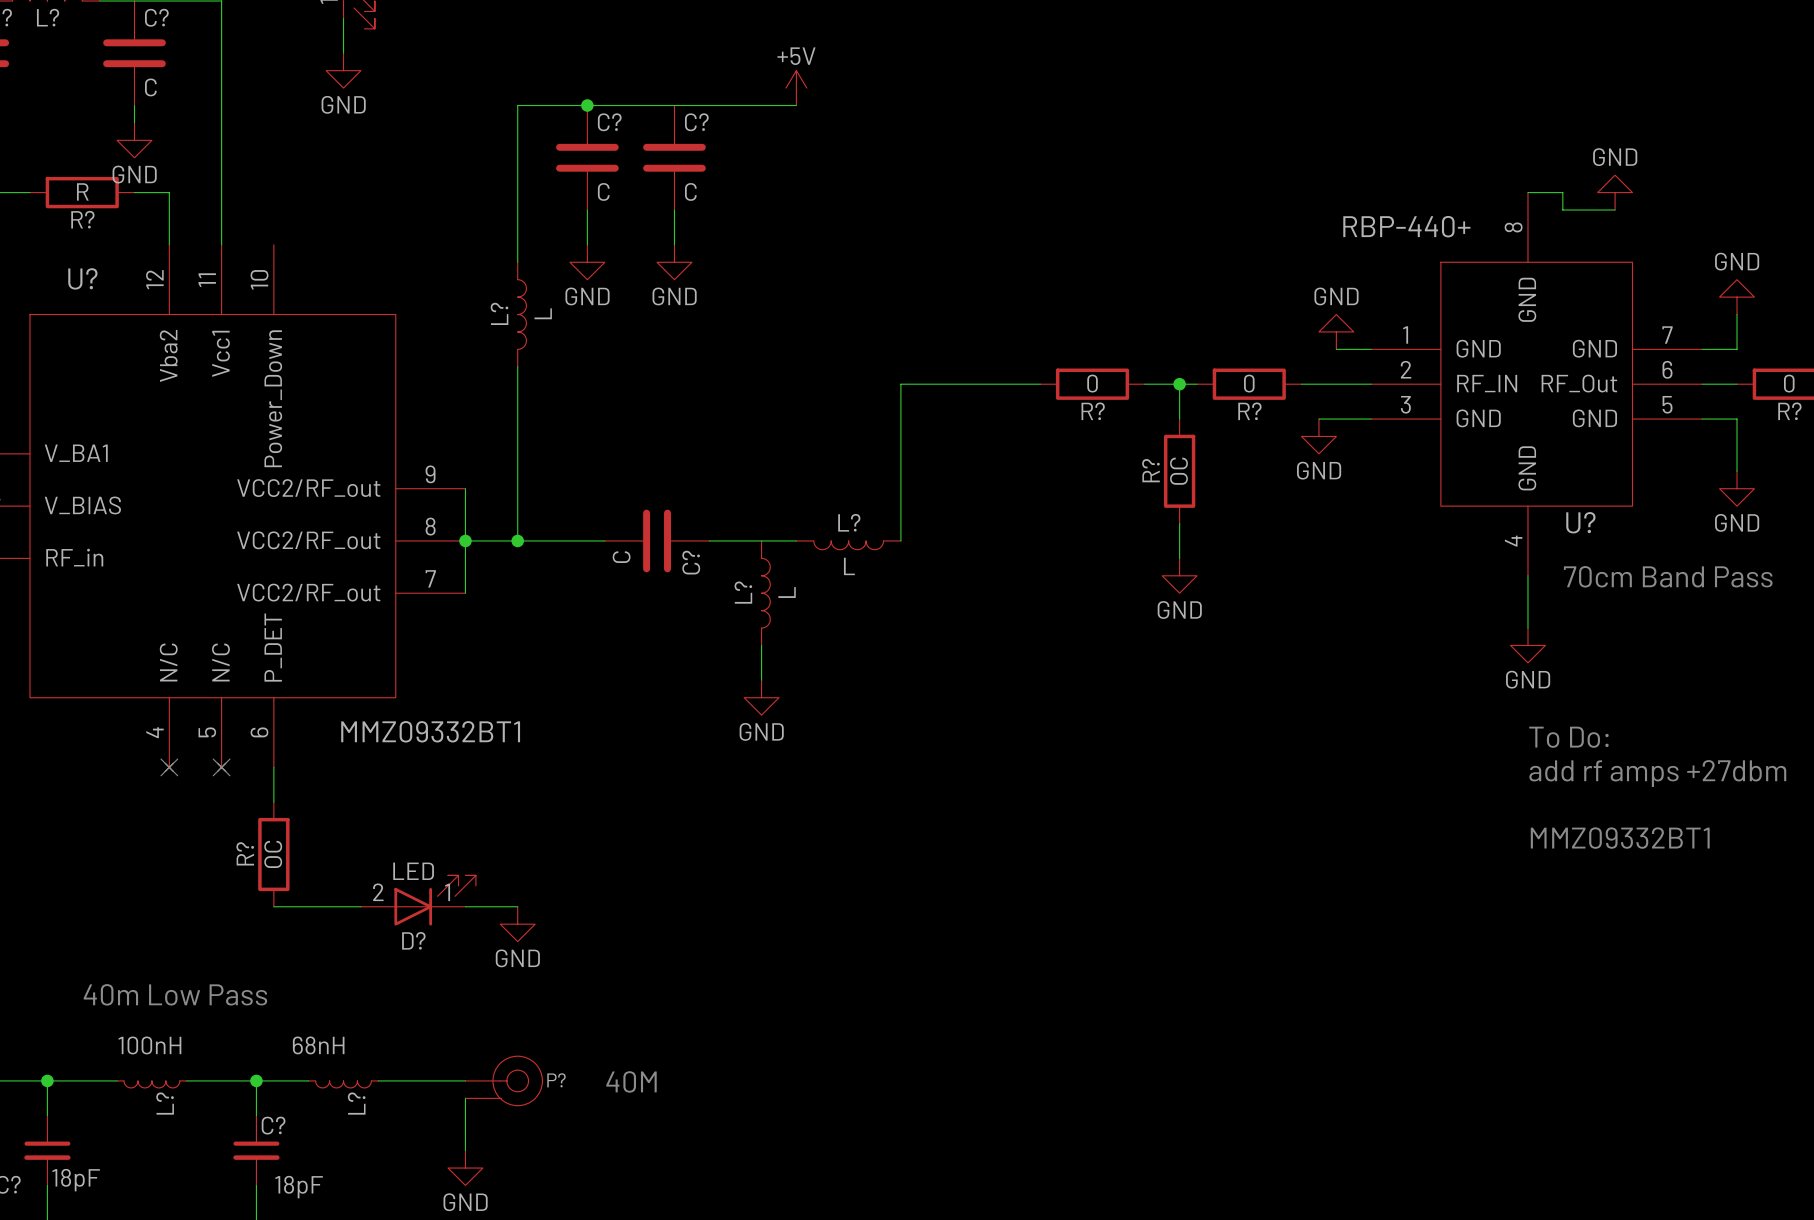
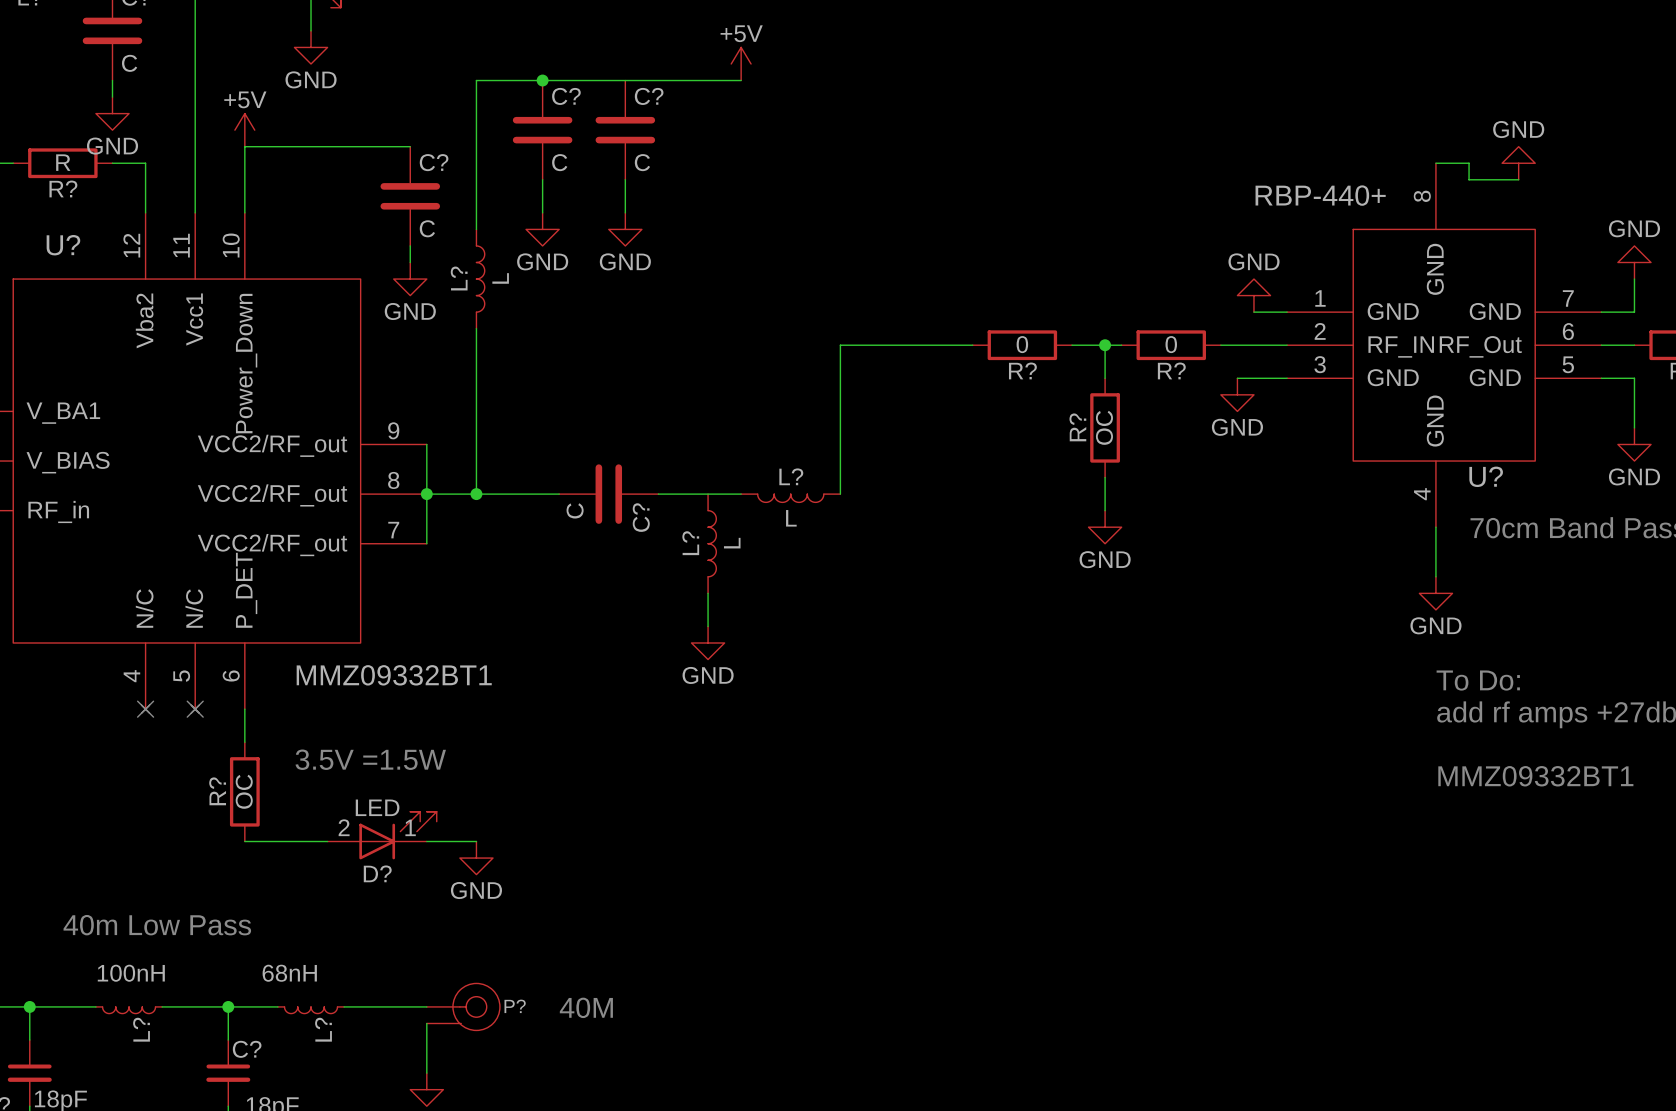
power symbol: none -> +5V (244, 130)
wire: none -> (410, 146) (244, 146) (244, 212)
C?: none -> C (410, 196)
wire: none -> (410, 245) (410, 262)
power symbol: none -> GND (410, 279)
text: none -> 3.5V =1.5W (370, 759)

